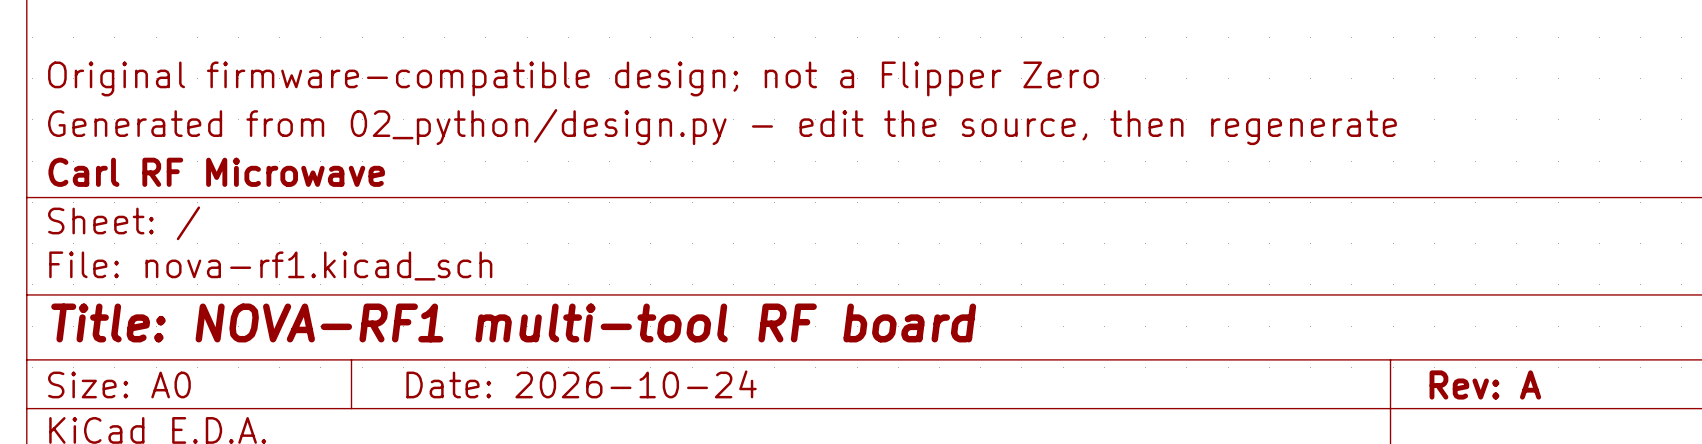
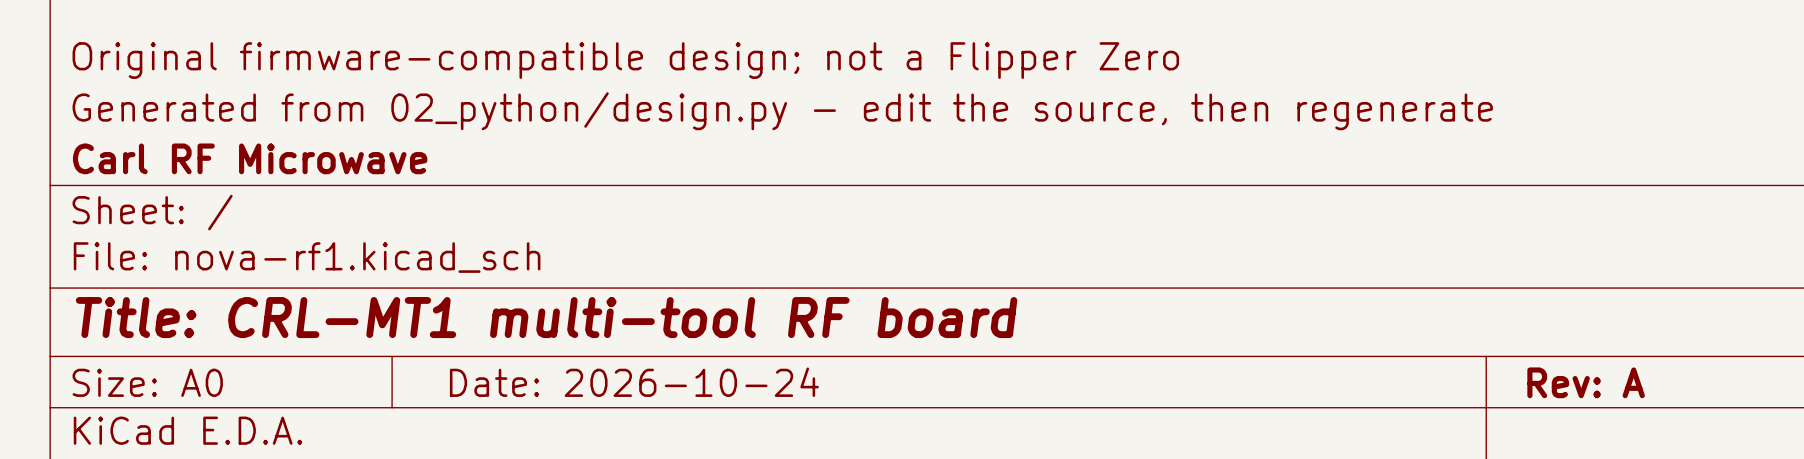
title block: Title: NOVA-RF1 multi-tool RF board (513, 322) -> Title: CRL-MT1 multi-tool RF board (546, 317)

